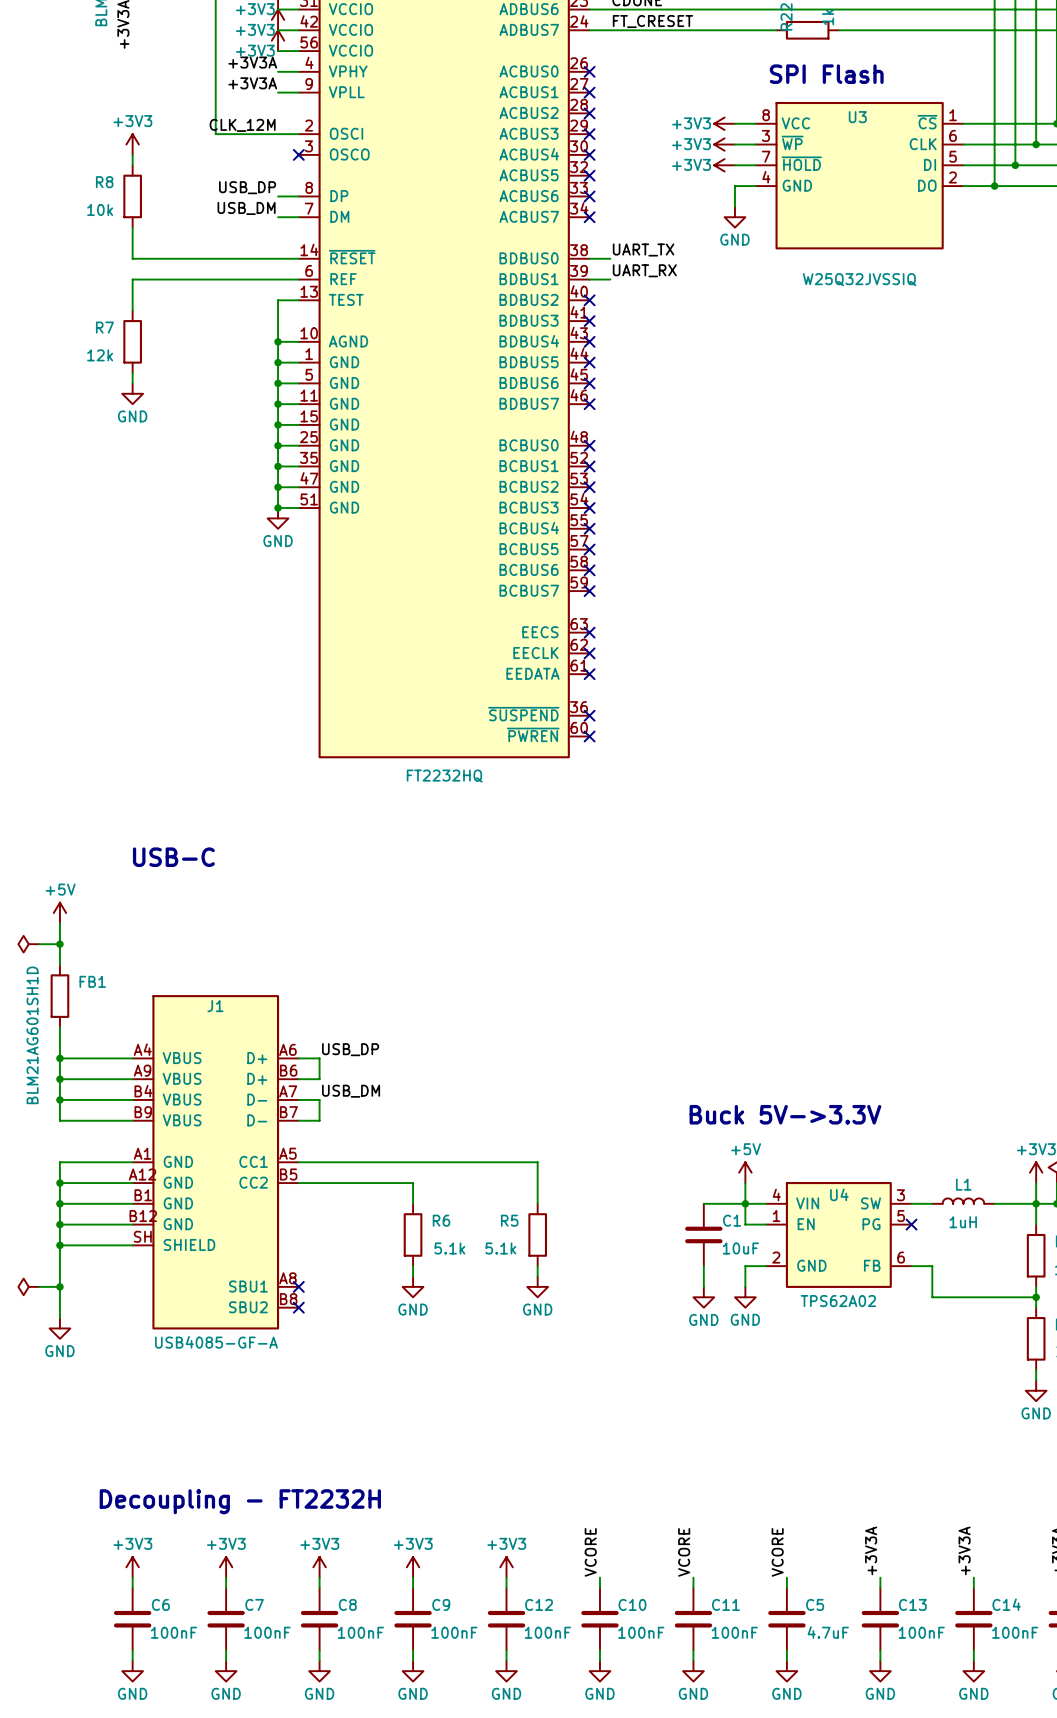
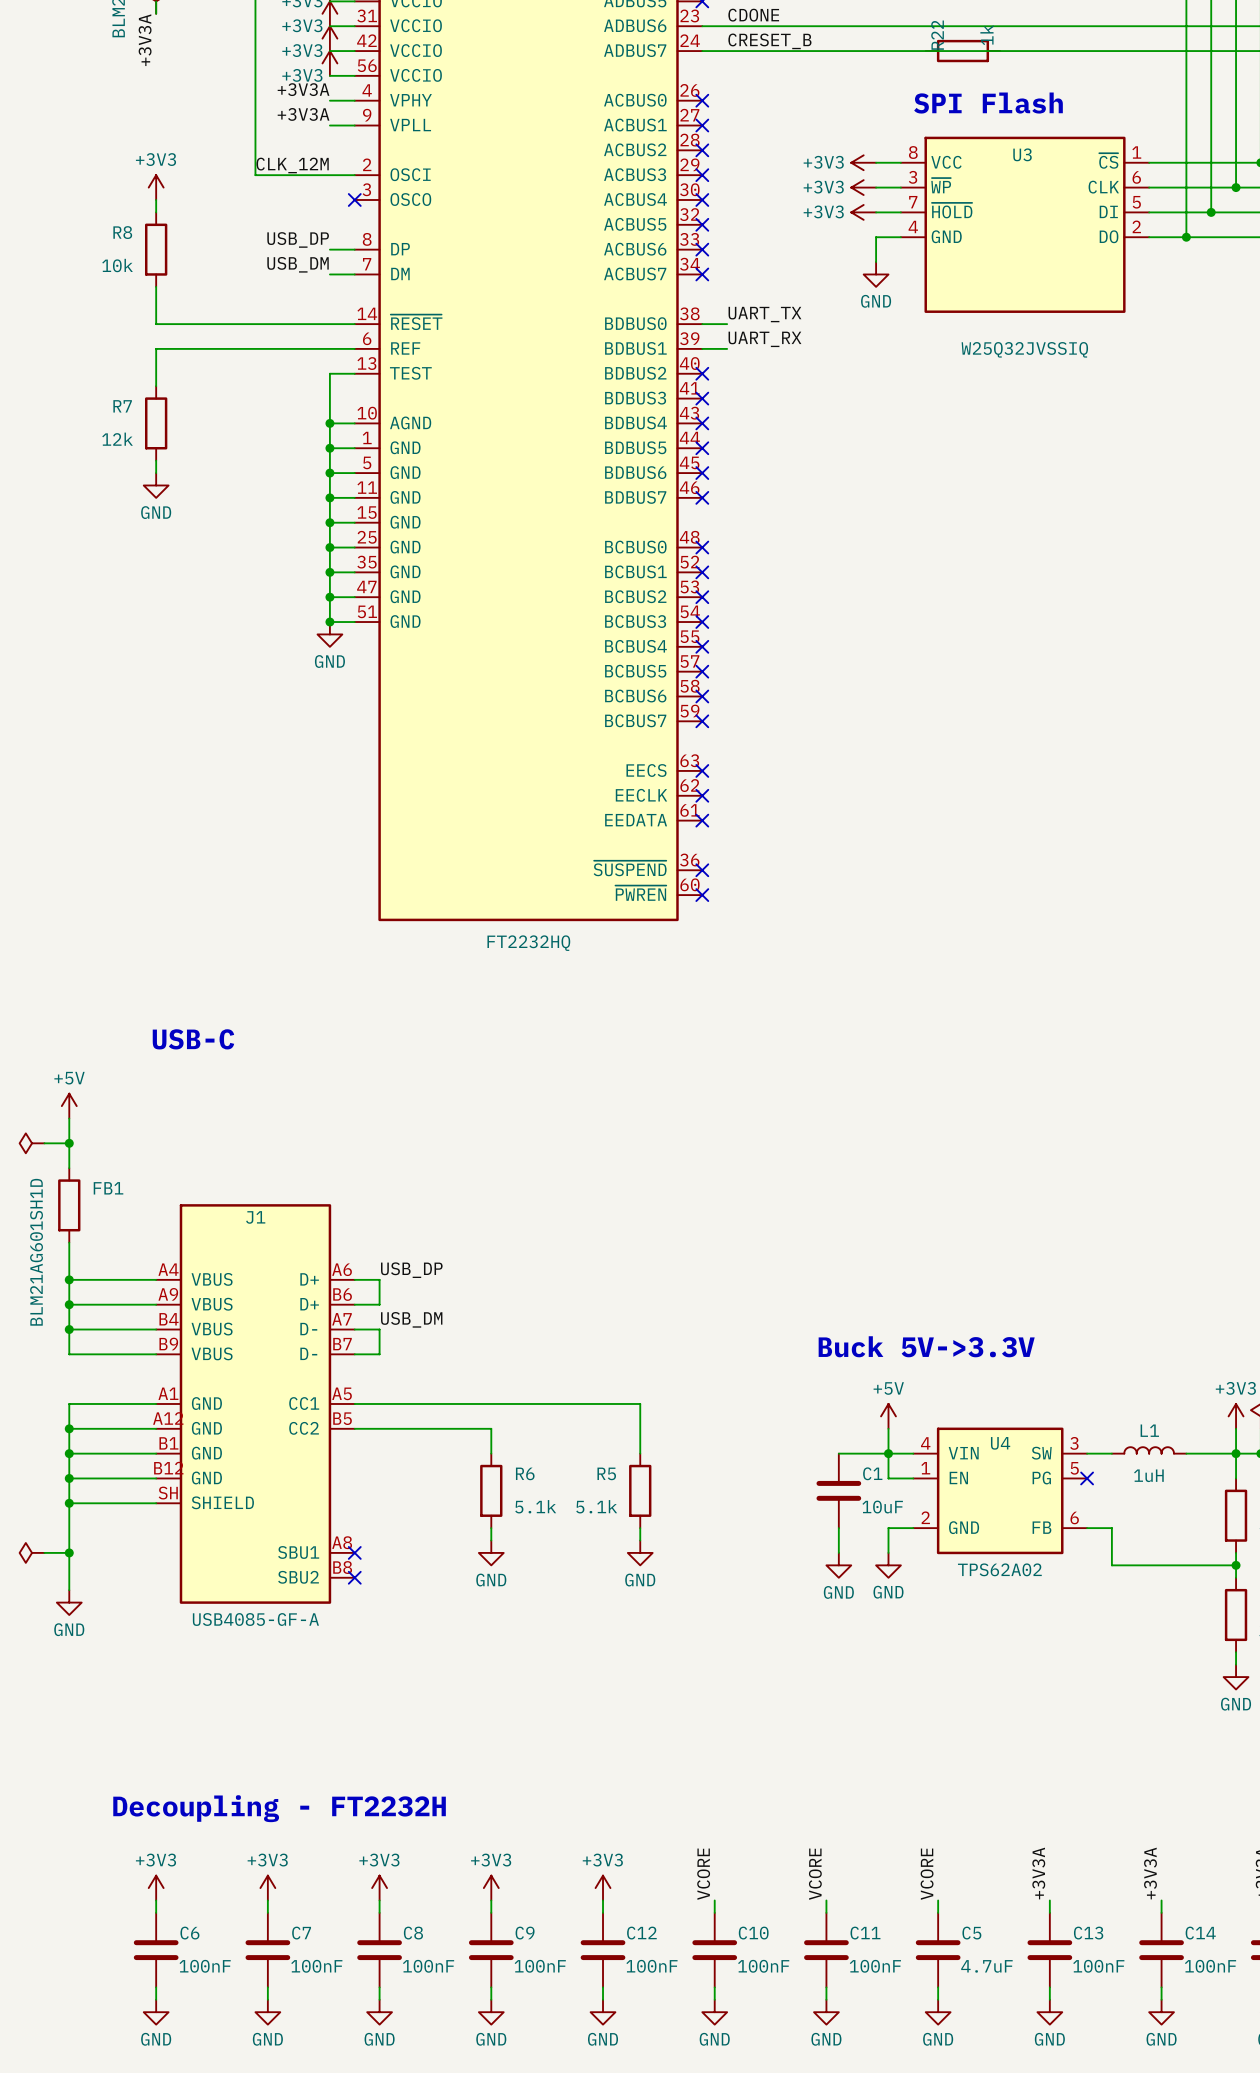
label: FT_CRESET (652, 21) -> CRESET_B (769, 41)
wire: none -> (925, 51) (1000, 51)

